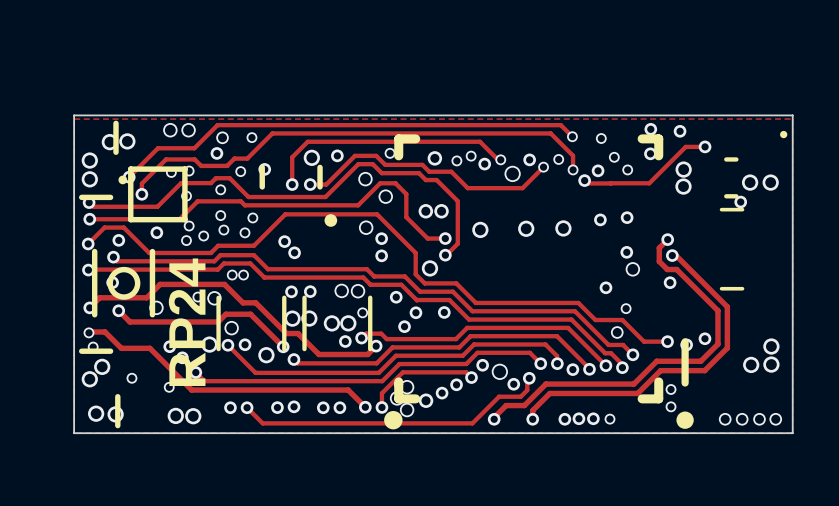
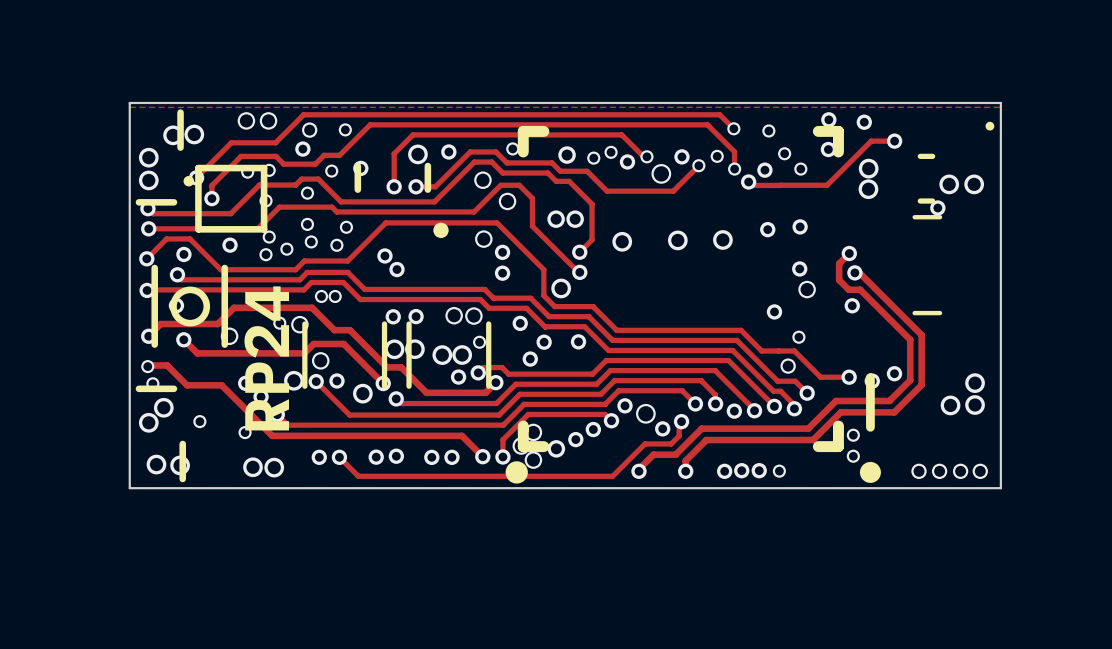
track: (455, 198) (457, 201) (457, 243) (445, 255) -> (592, 204) (592, 239) (579, 252)
track: (427, 238) (445, 238) -> (558, 252) (578, 272)

